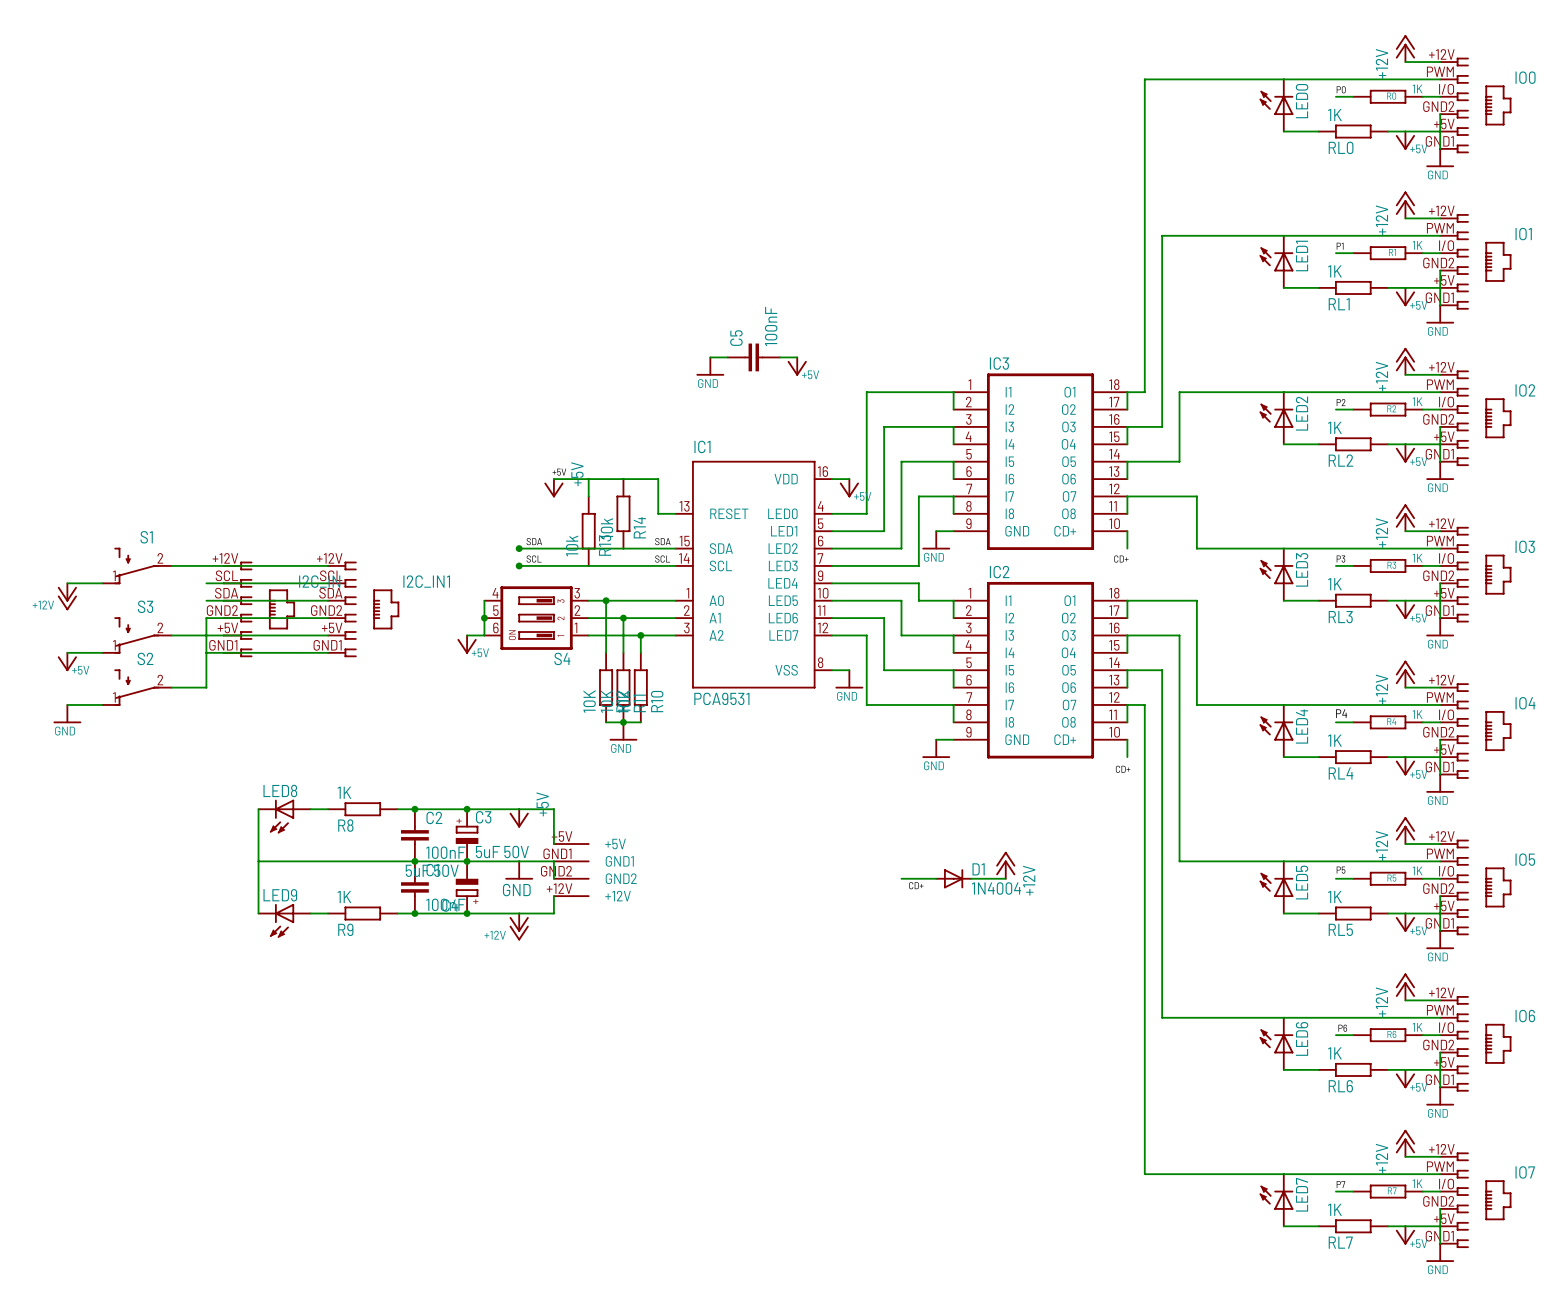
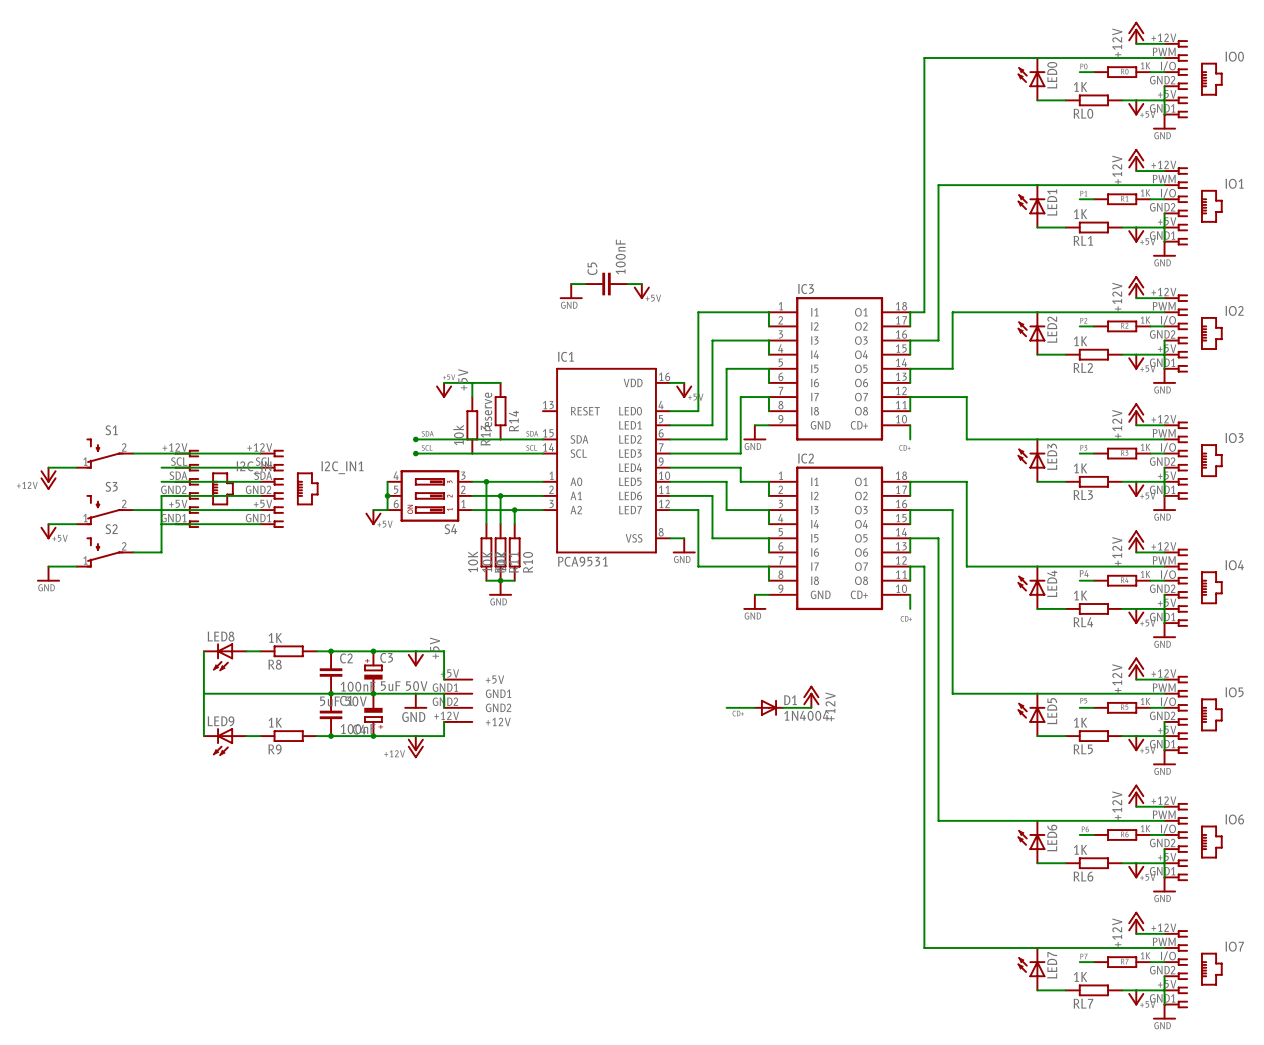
wire: (623, 479) (658, 479) (658, 513) (675, 513) -> none
R14 value: 10k (606, 528) -> reserve (488, 411)

